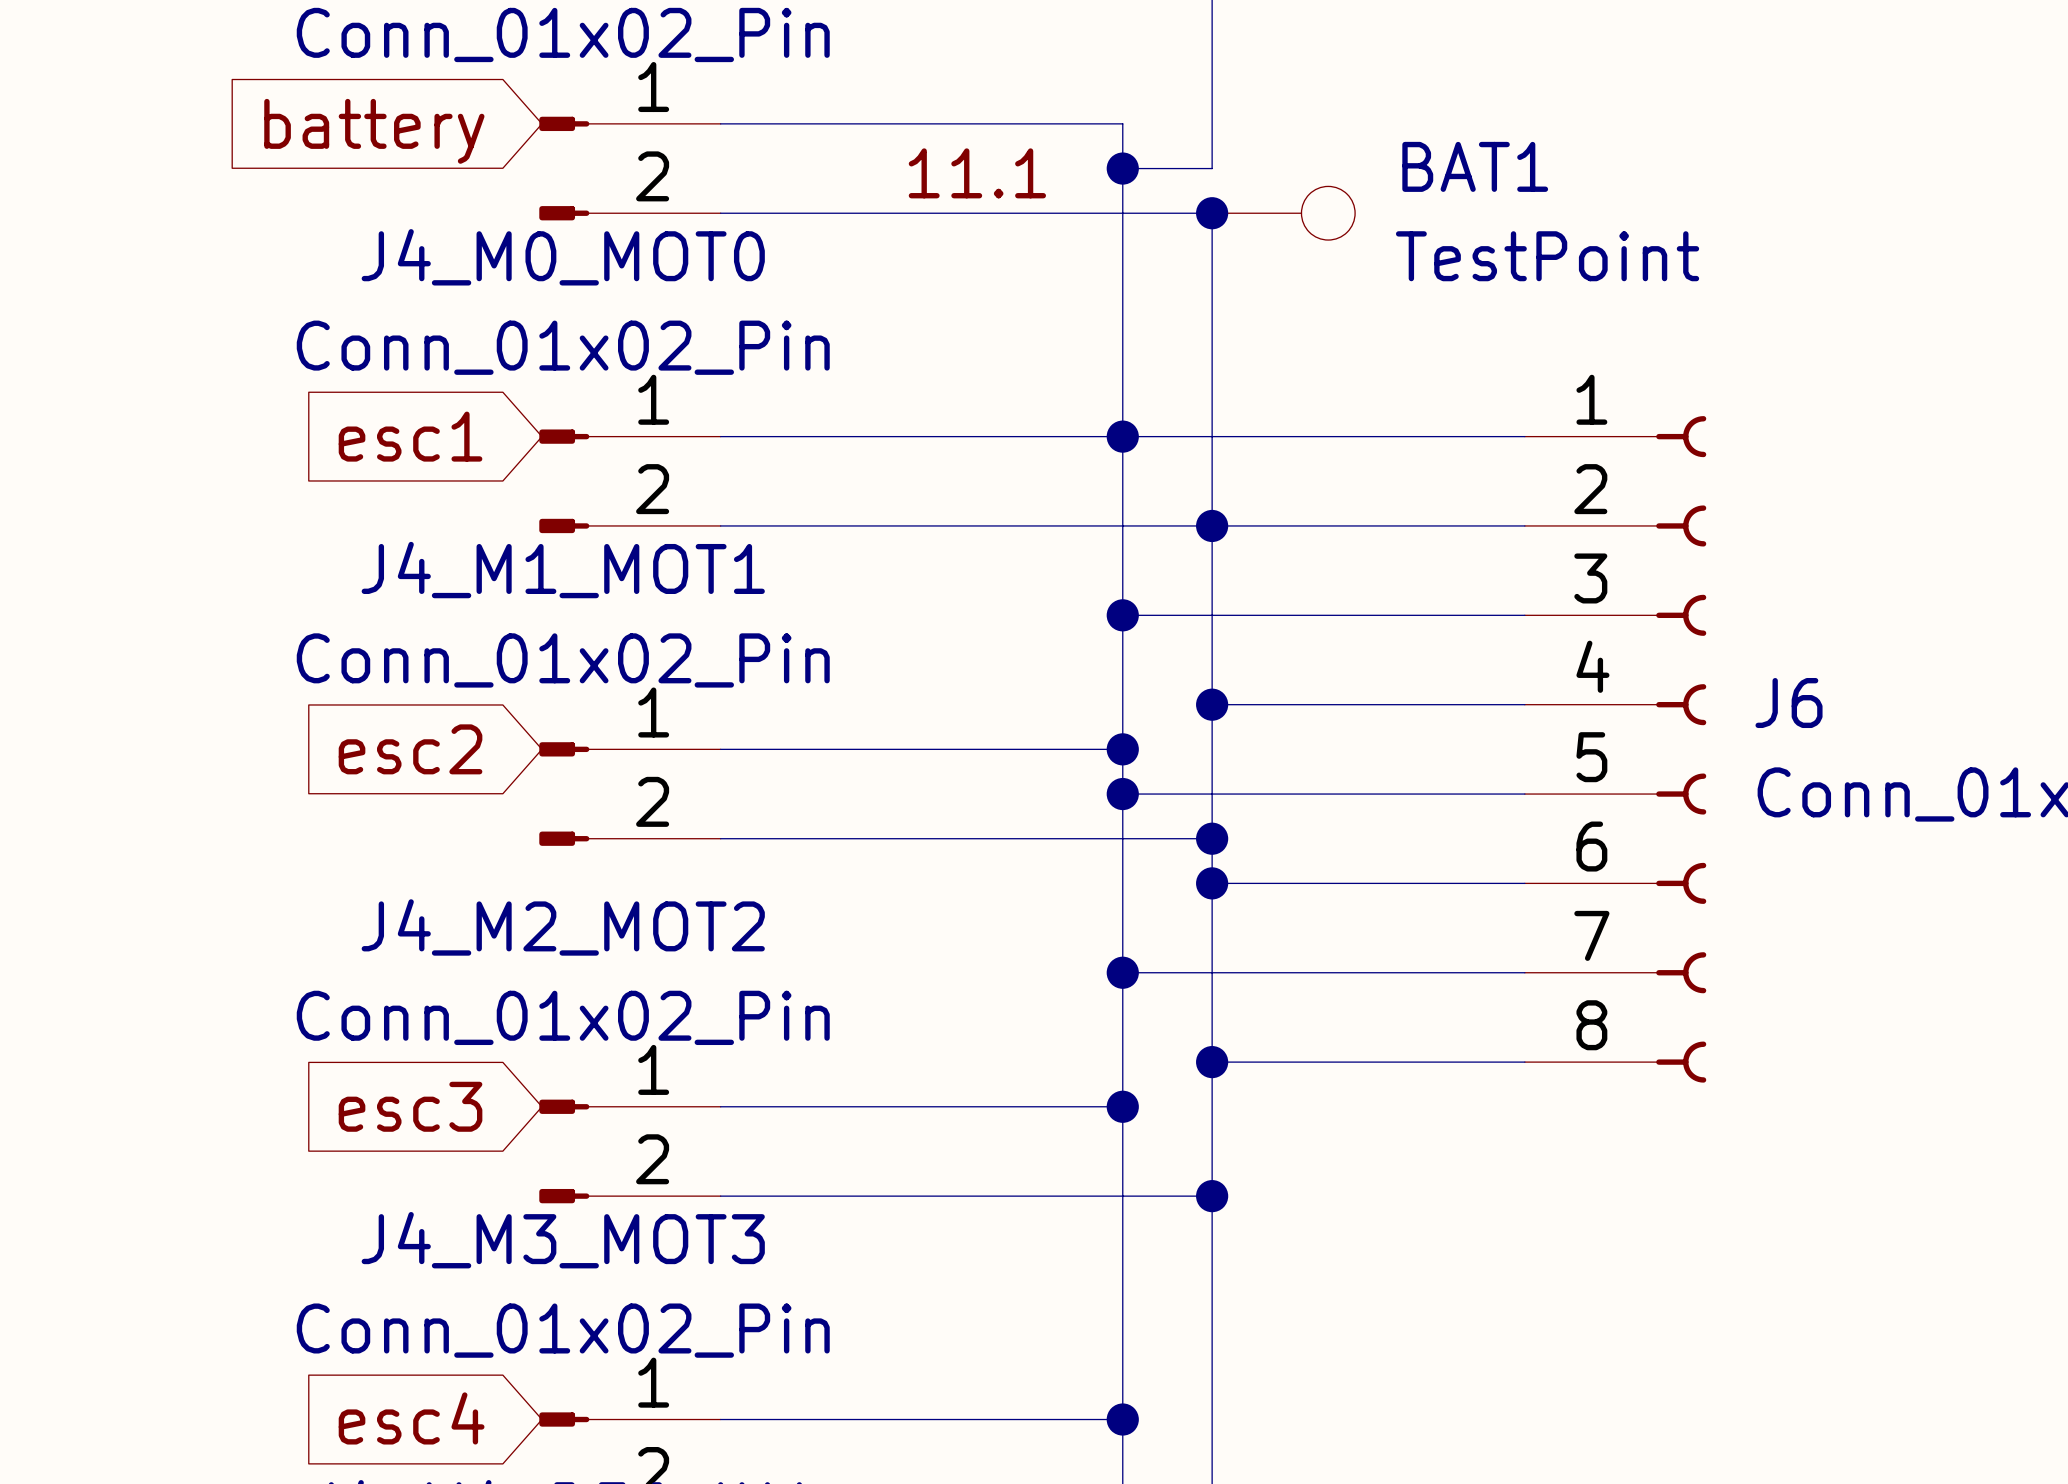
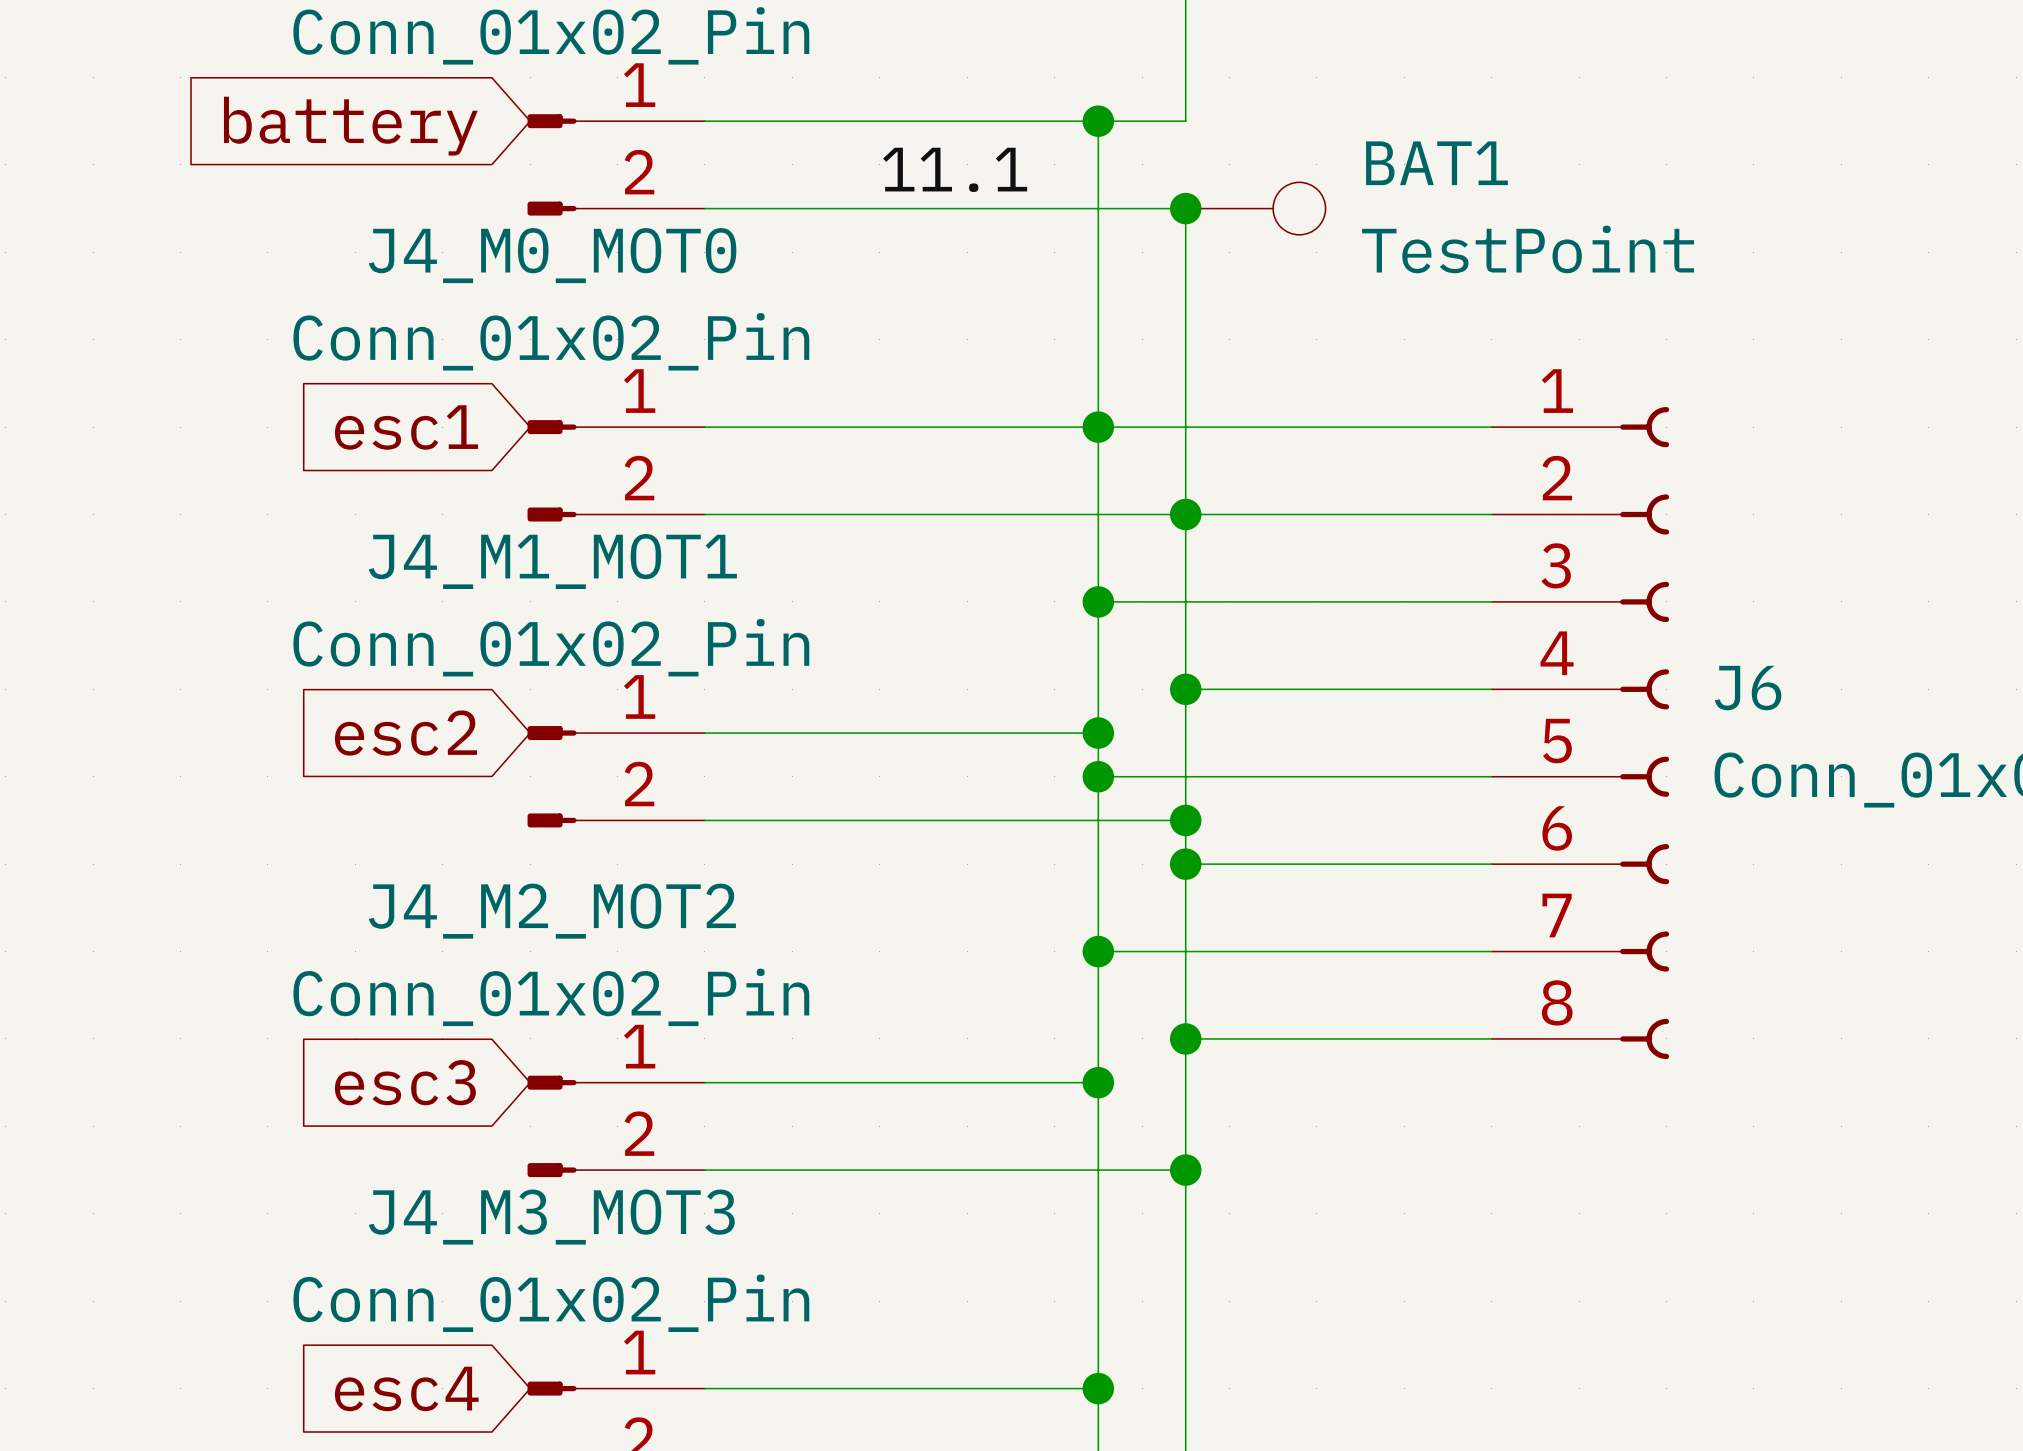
wire: (1212, 123) (1212, 168) (1122, 168) -> (1185, 121) (1098, 121)
junction position: (1122, 168) -> (1098, 121)

